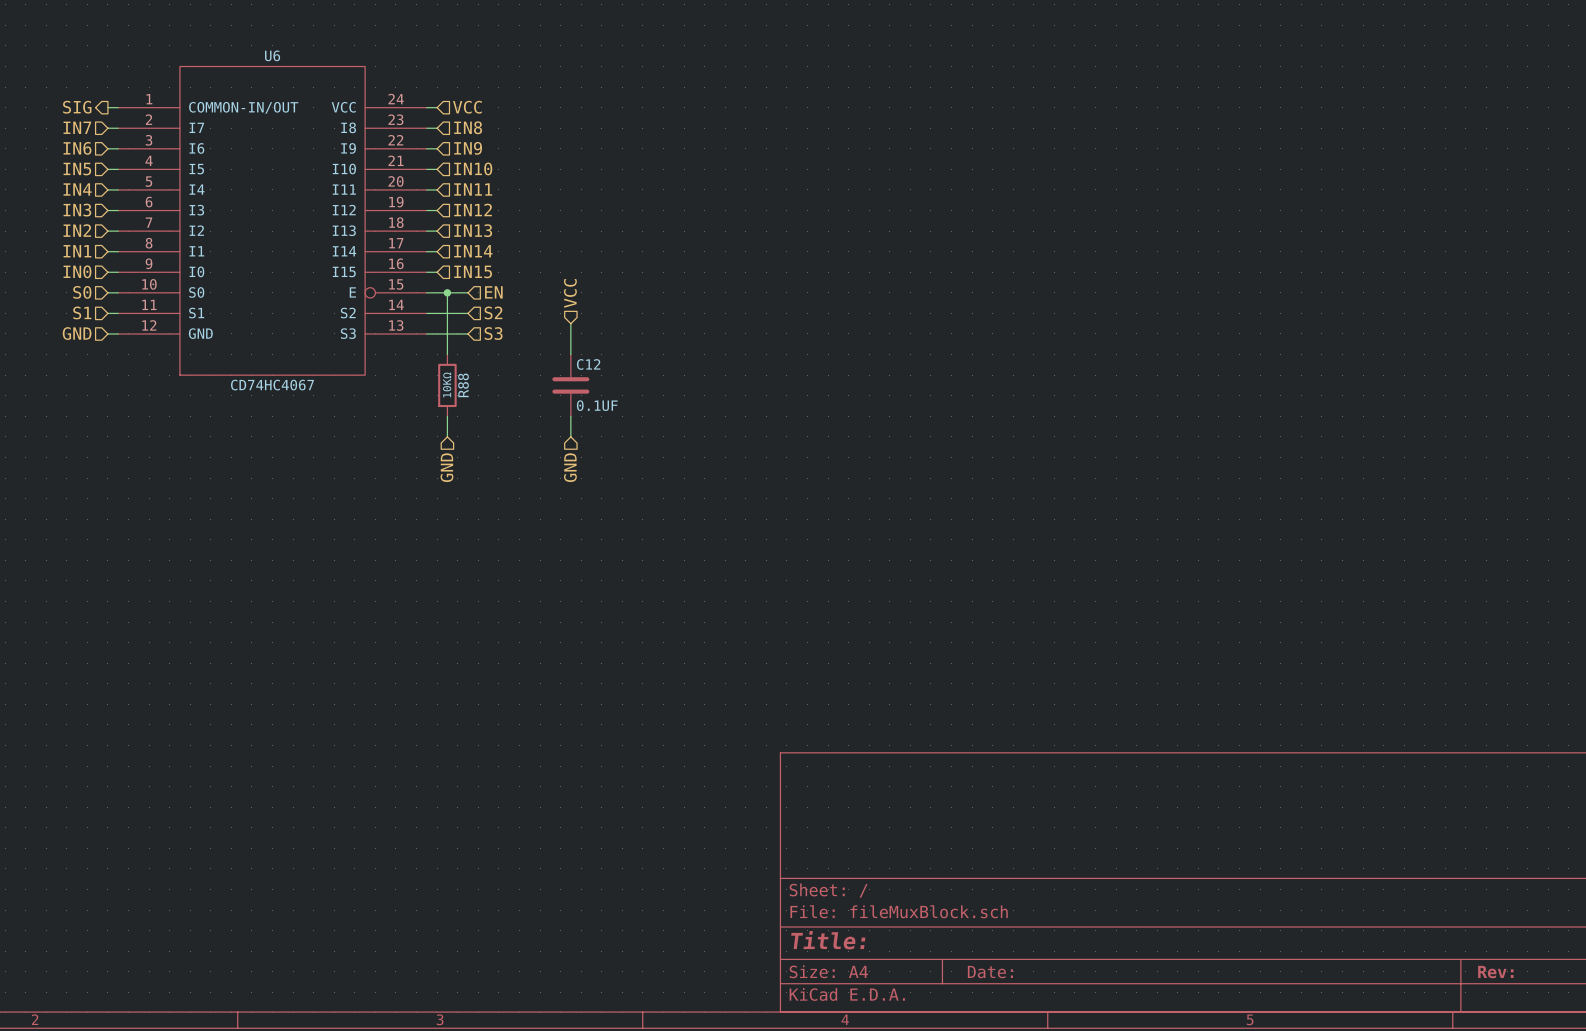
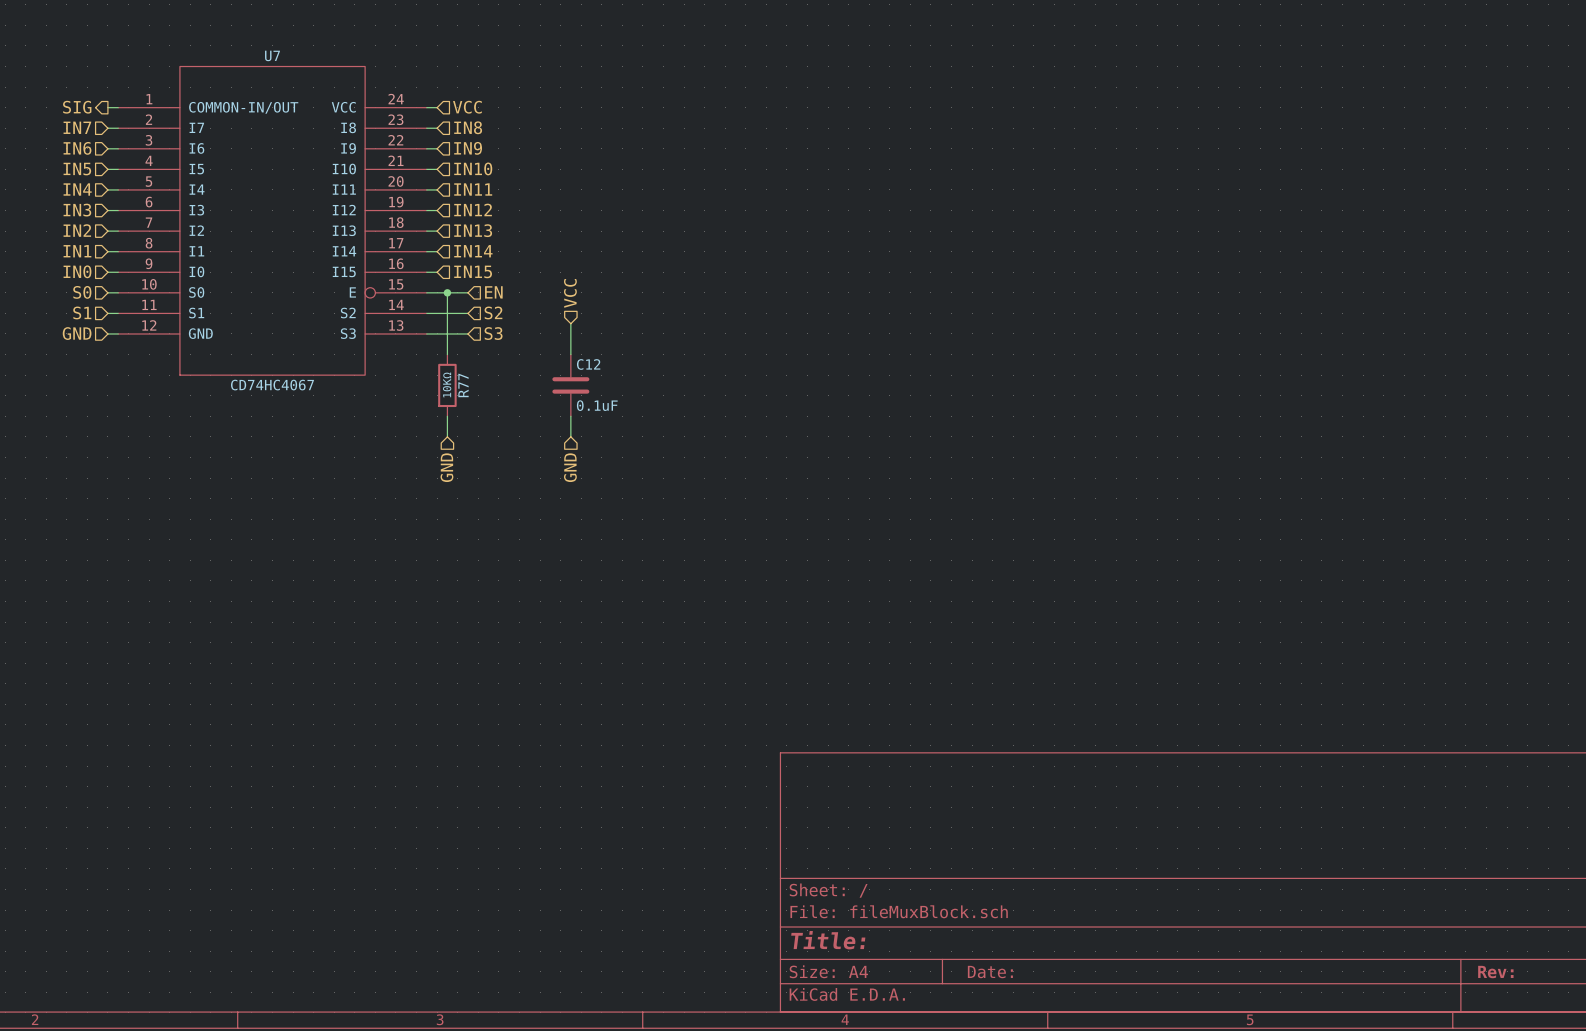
U6 name: U6 (272, 55) -> U7 (272, 55)
R88 name: R88 (463, 385) -> R77 (463, 385)
C12 value: 0.1UF (597, 405) -> 0.1uF (597, 405)

